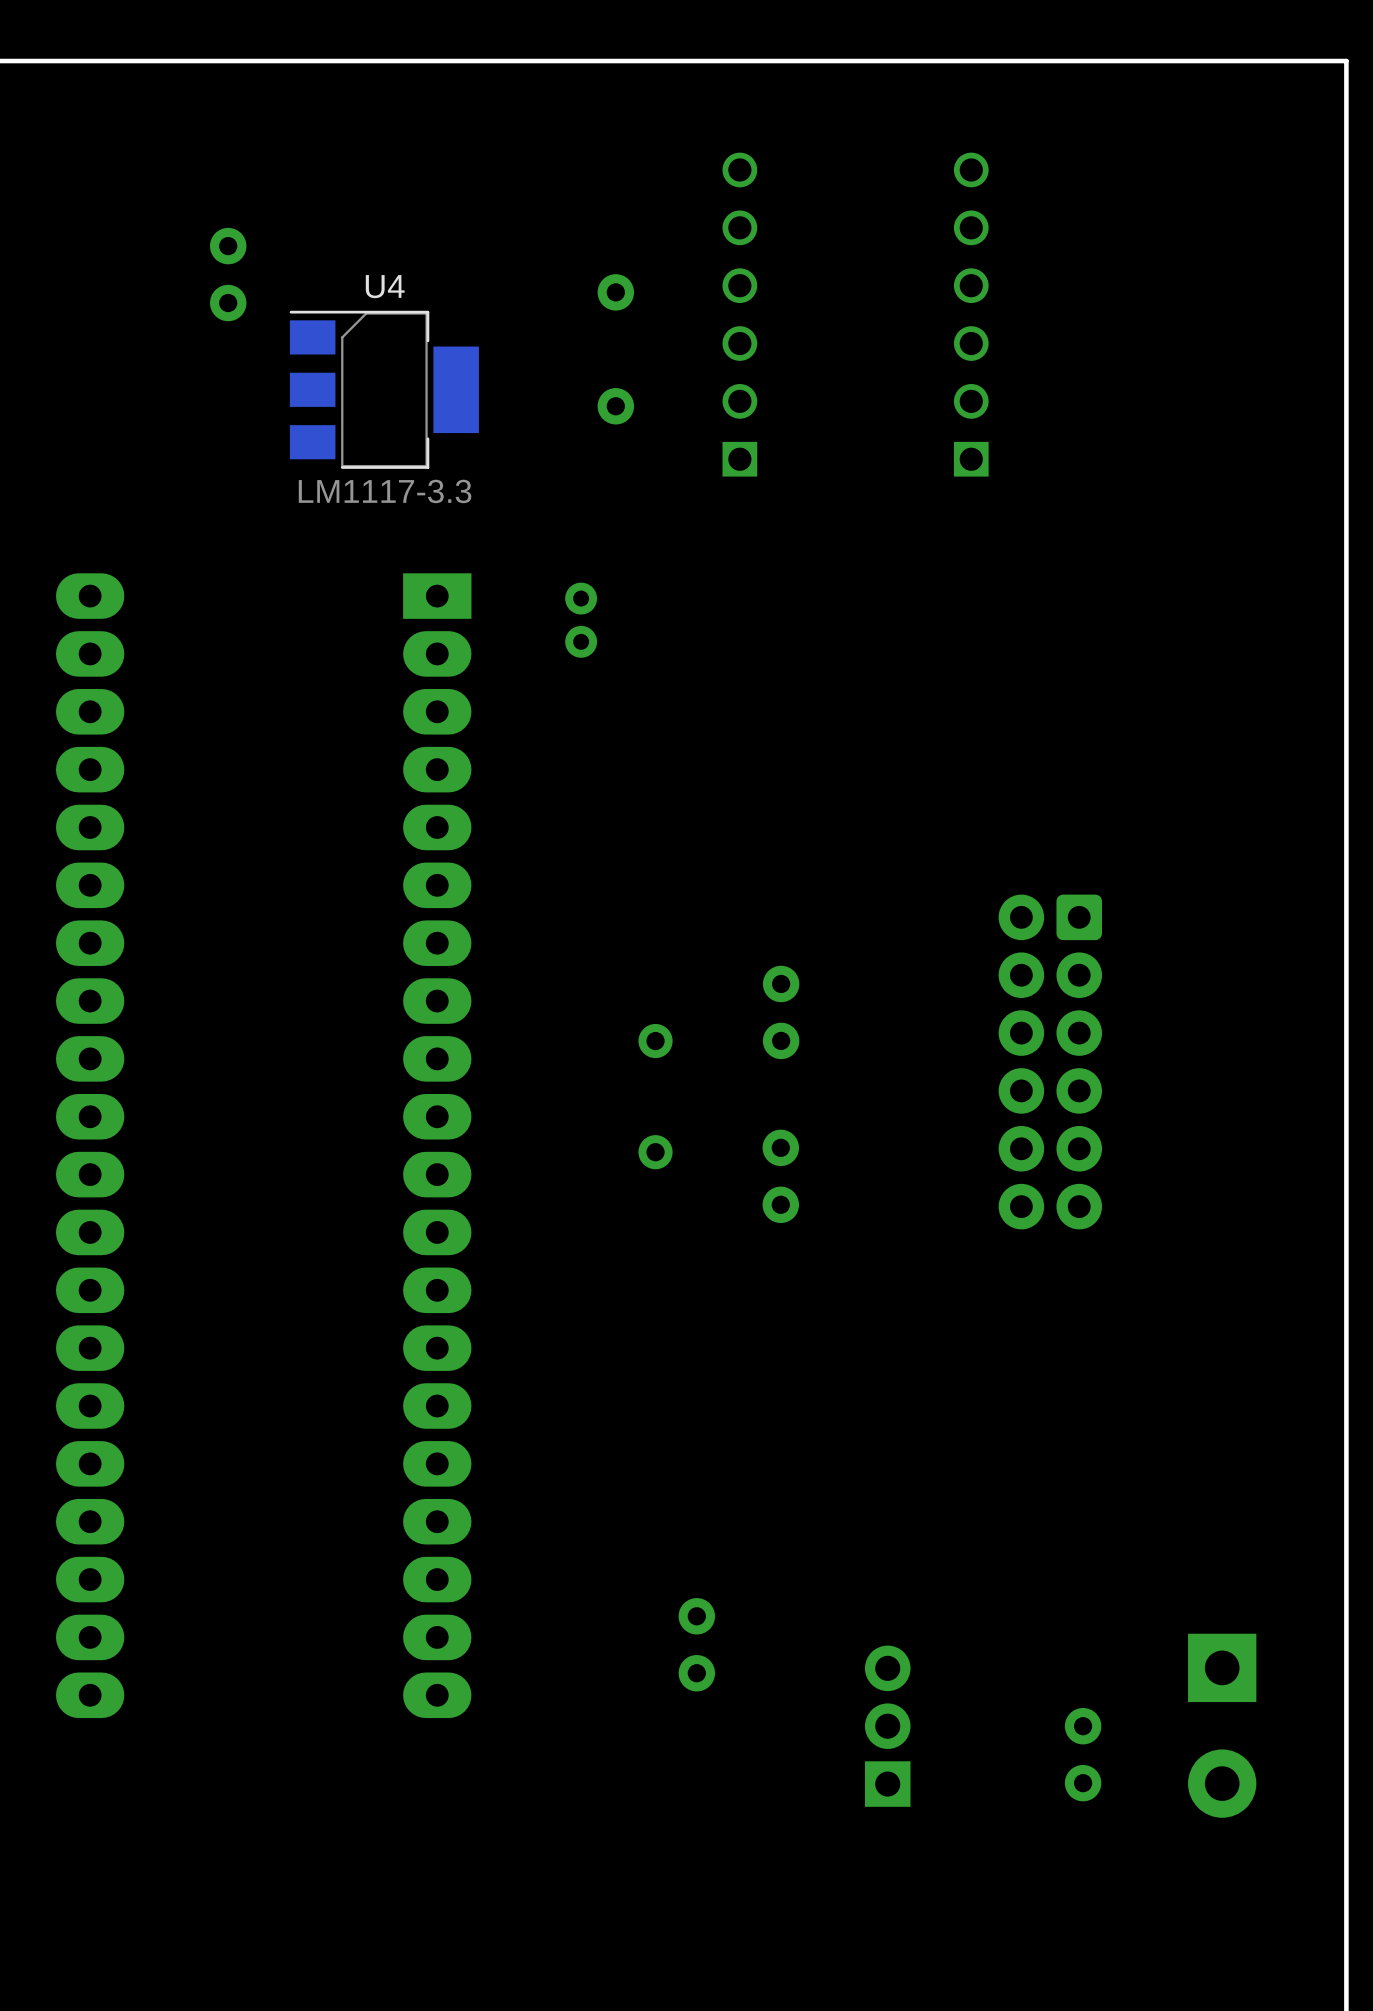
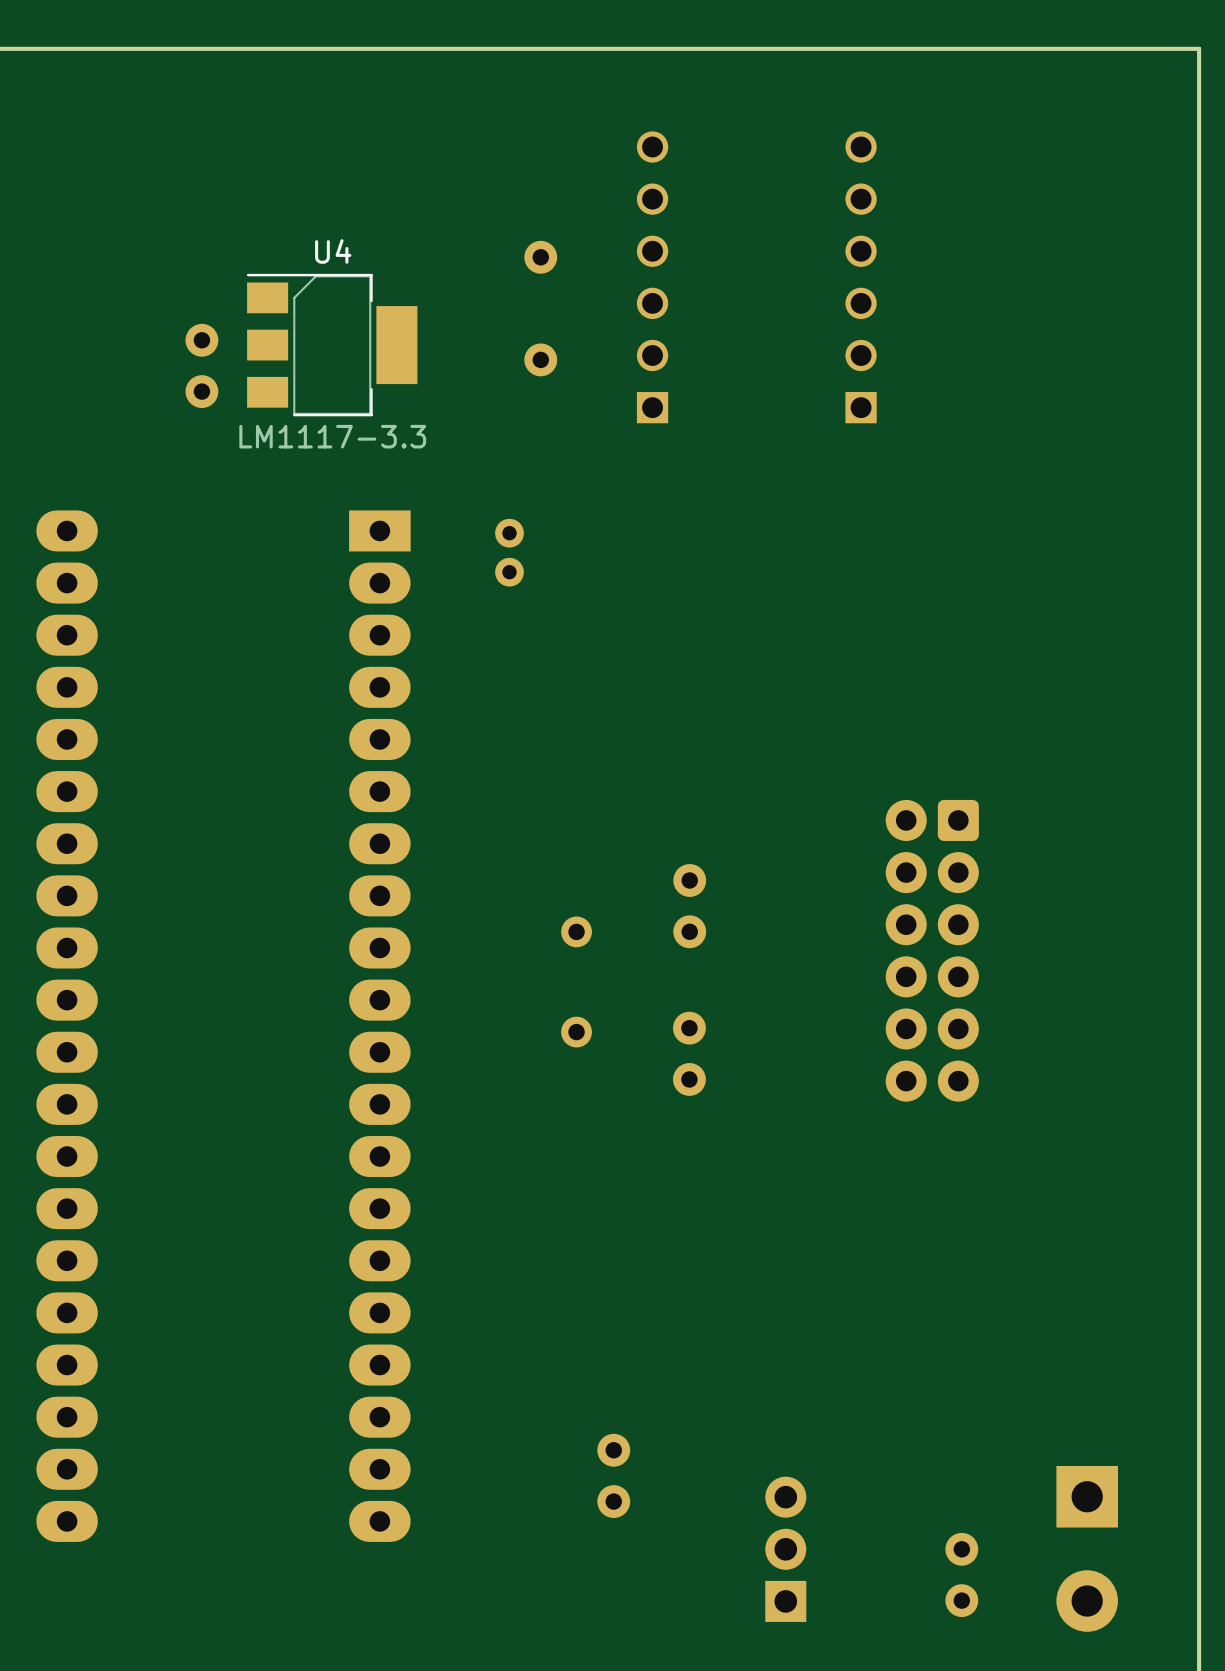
part position: (228, 274) -> (201, 365)

